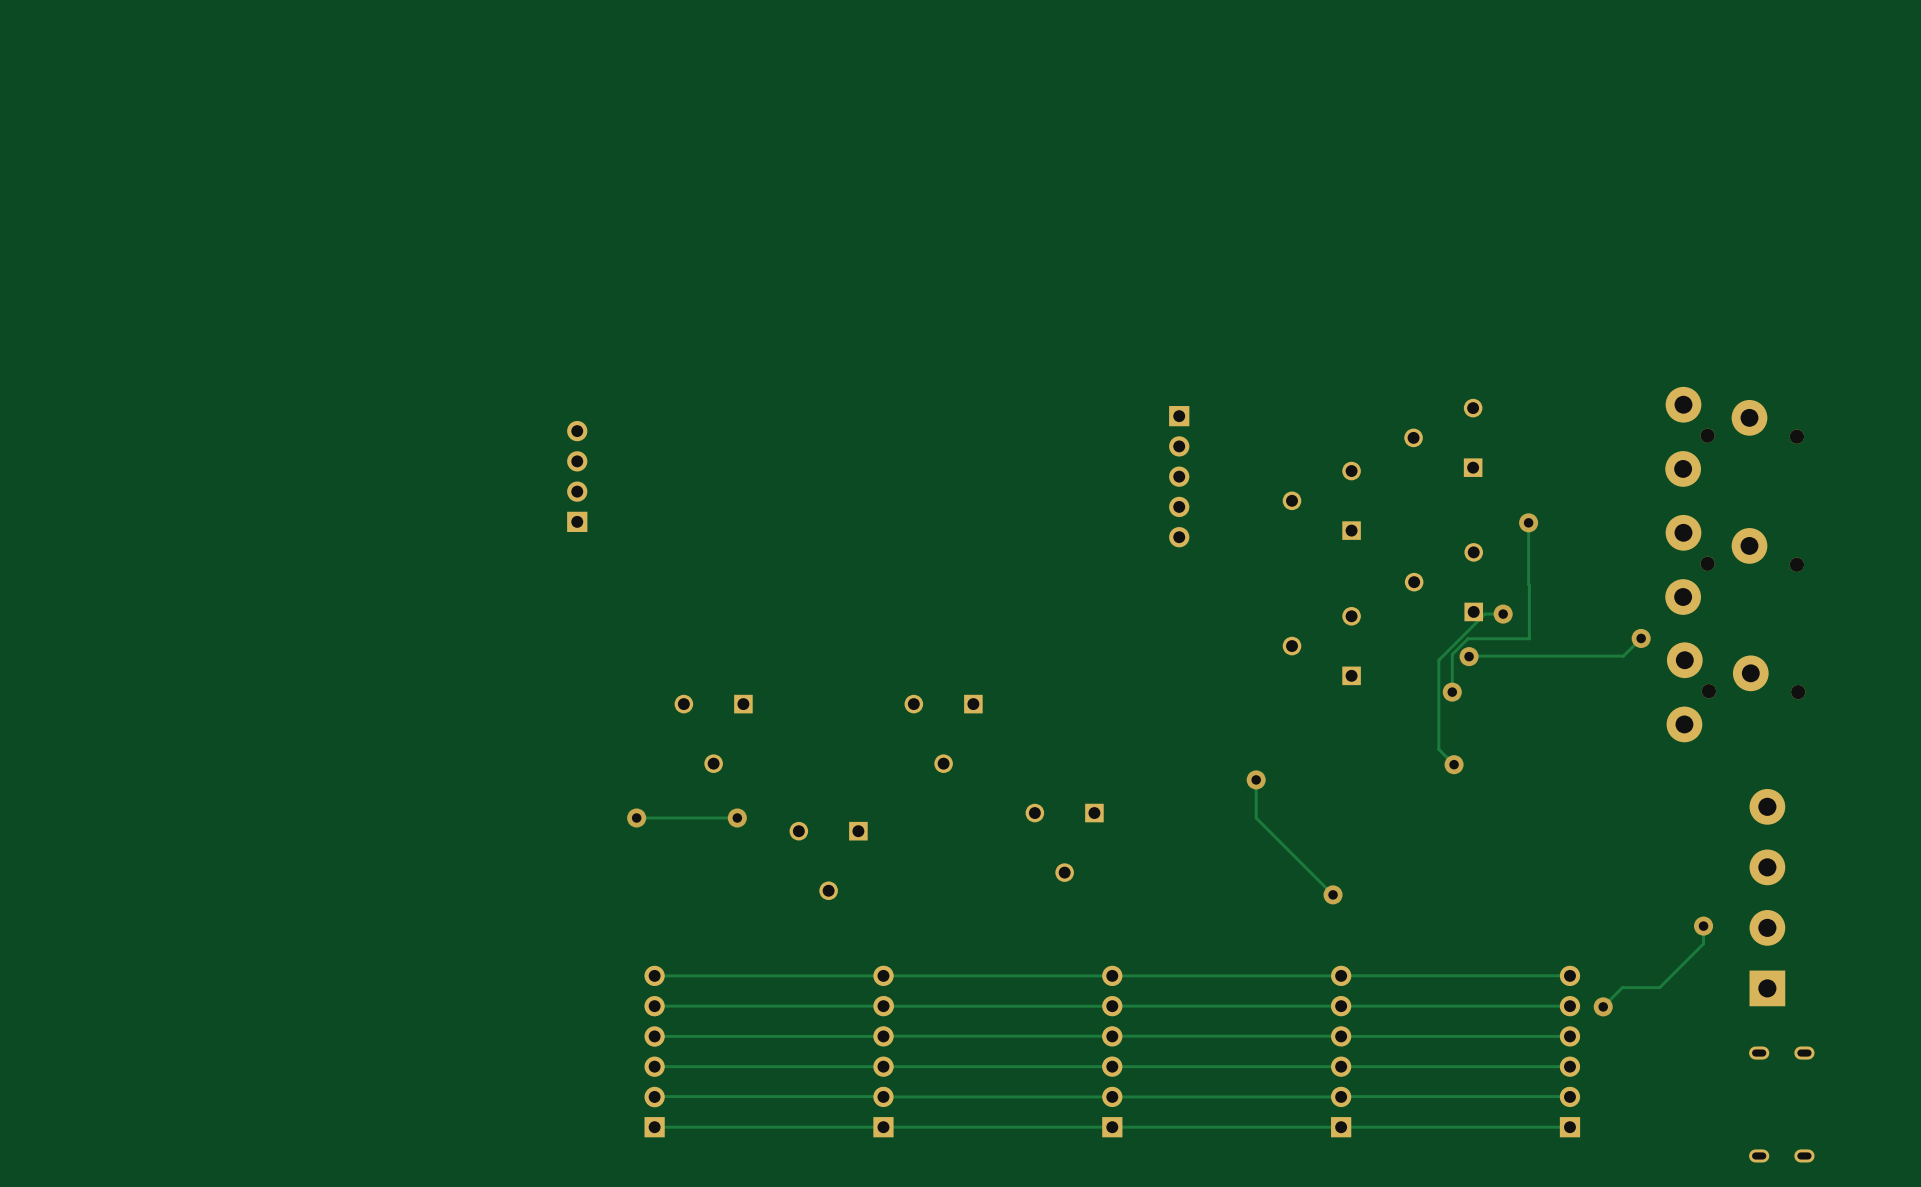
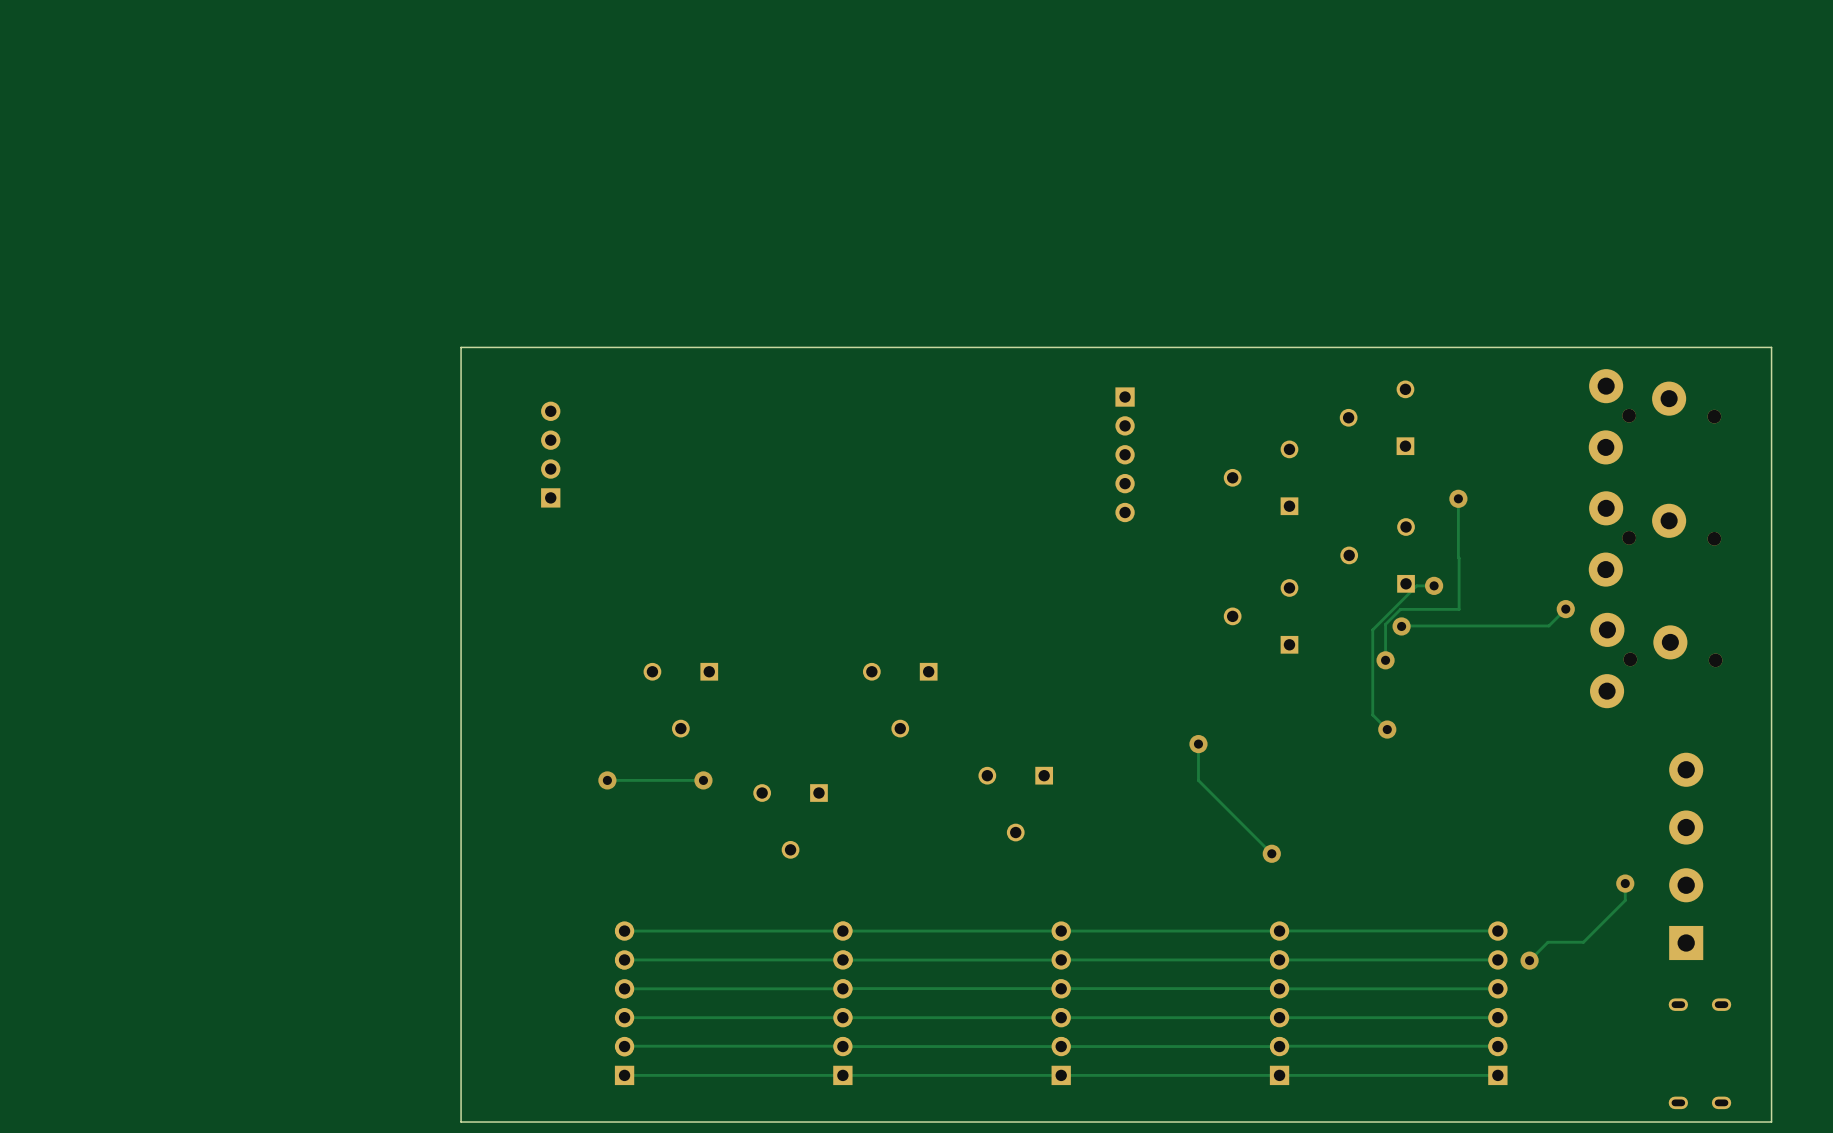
board edge: none -> (1771, 347) (461, 347) (461, 1122) (1771, 1122) (1771, 347)

